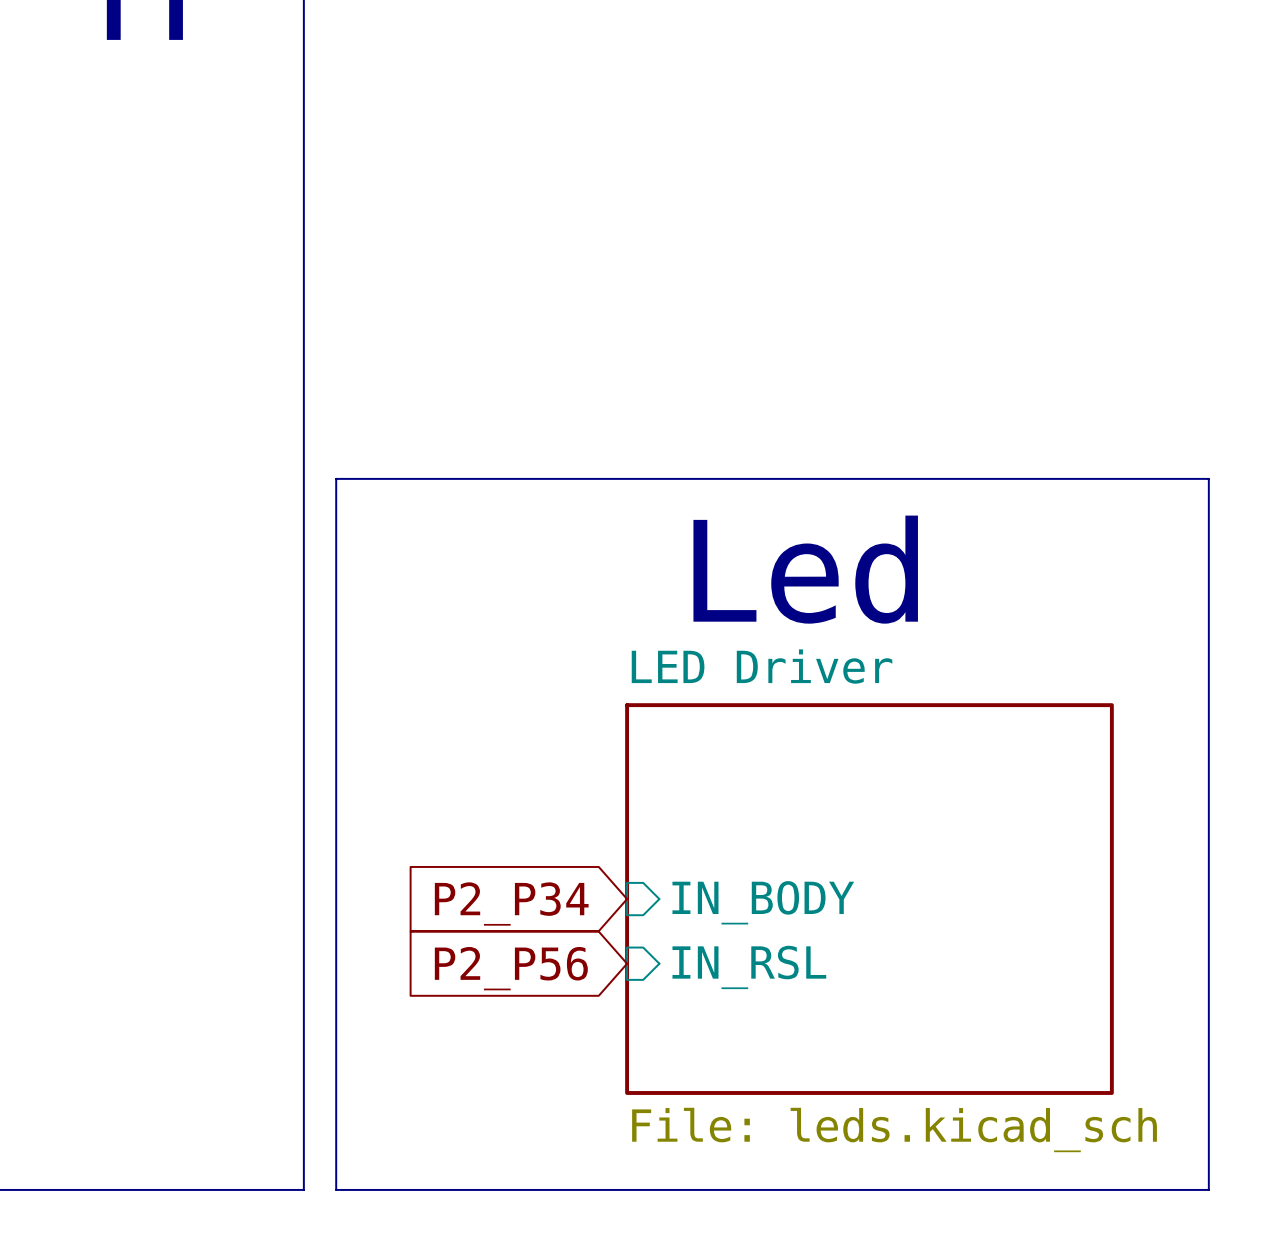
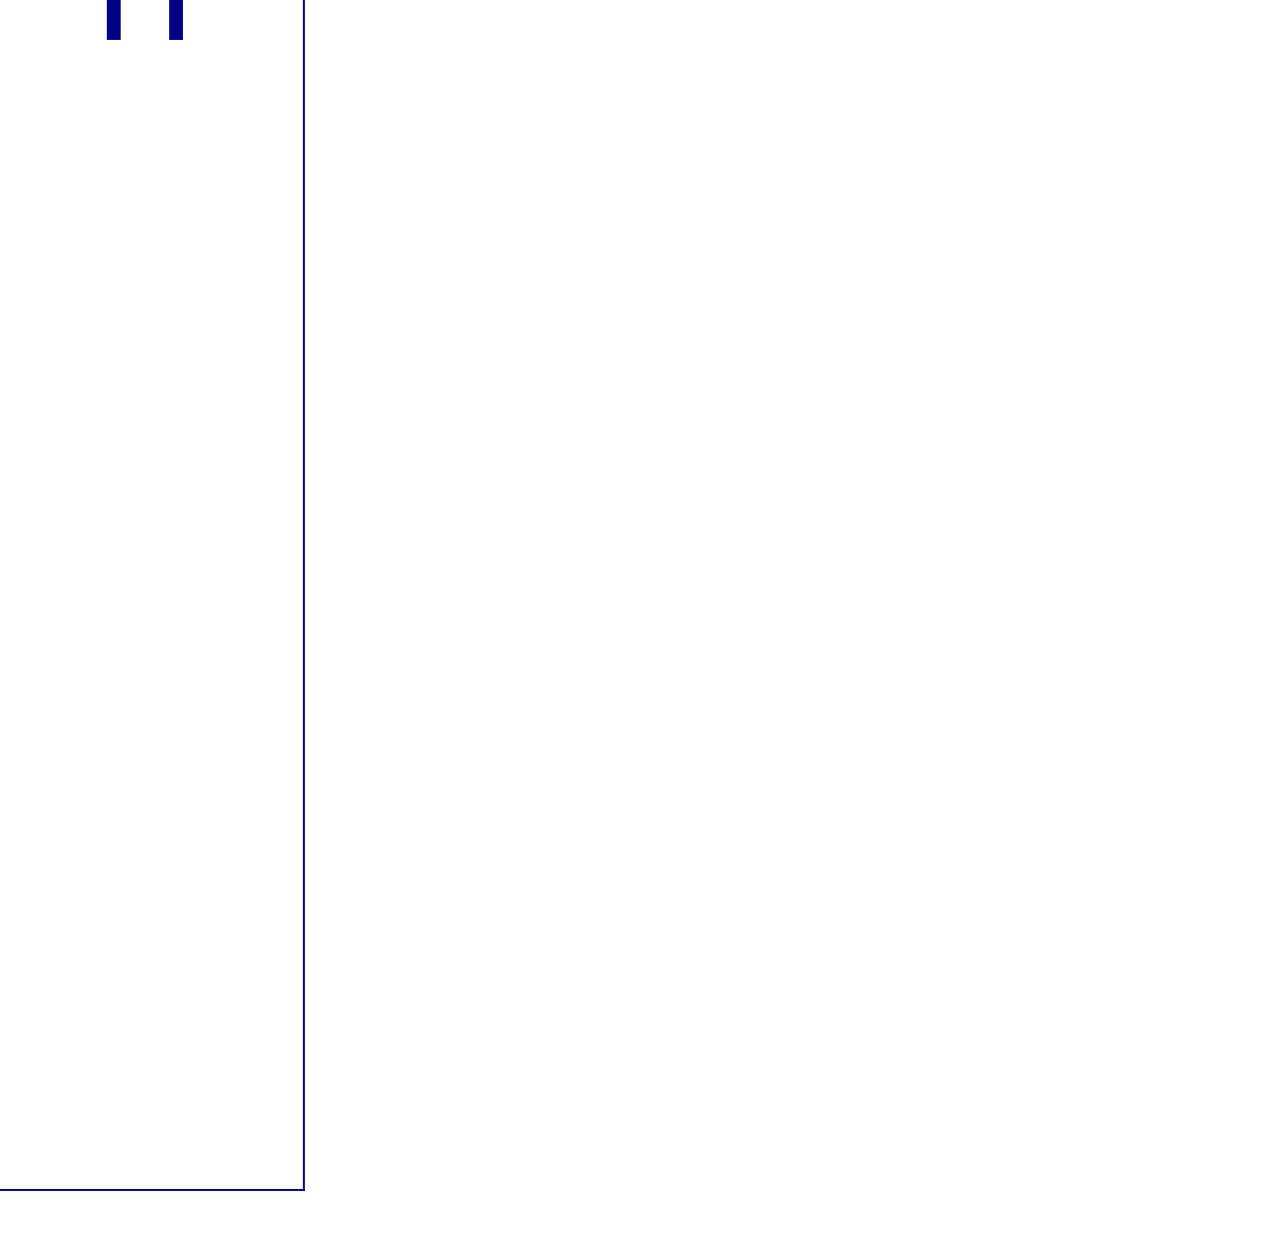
line: (336, 478) (1208, 478) (1208, 1189) (336, 1189) (336, 478) -> none
text: Led (805, 569) -> none
sheet LED Driver: File: leds.kicad_sch (869, 899) -> none
sheet pin: IN_BODY (763, 902) -> none
global label: P2_P34 (511, 904) -> none
sheet pin: IN_RSL (749, 967) -> none
global label: P2_P56 (511, 968) -> none

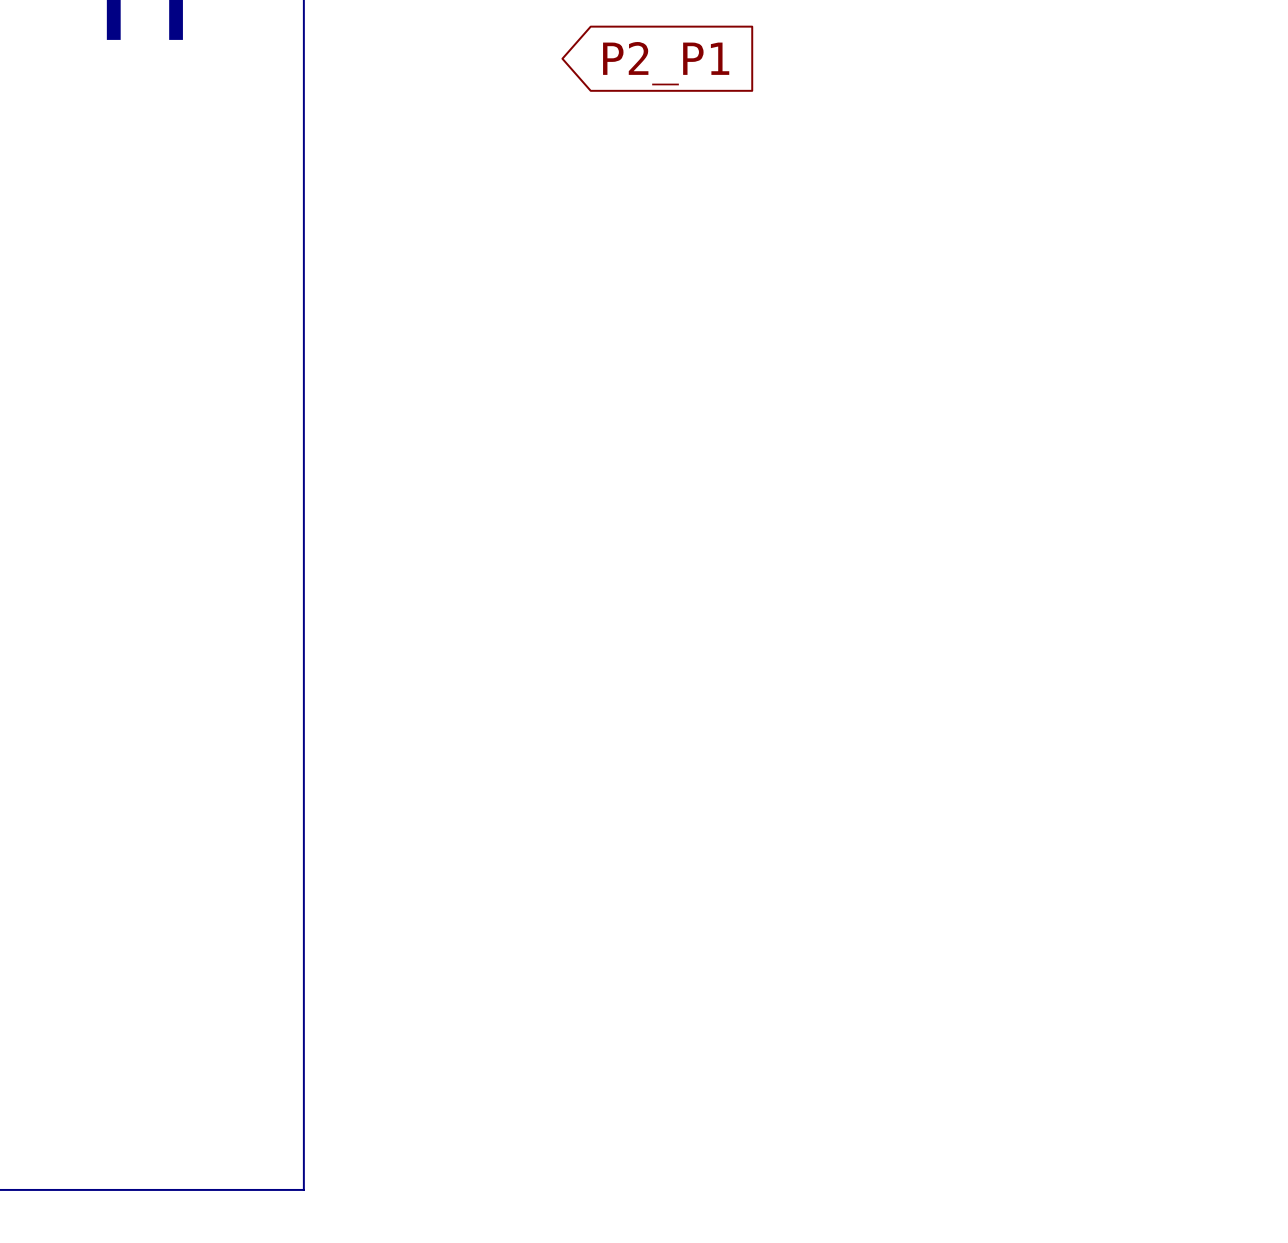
global label: none -> P2_P1 (666, 63)

